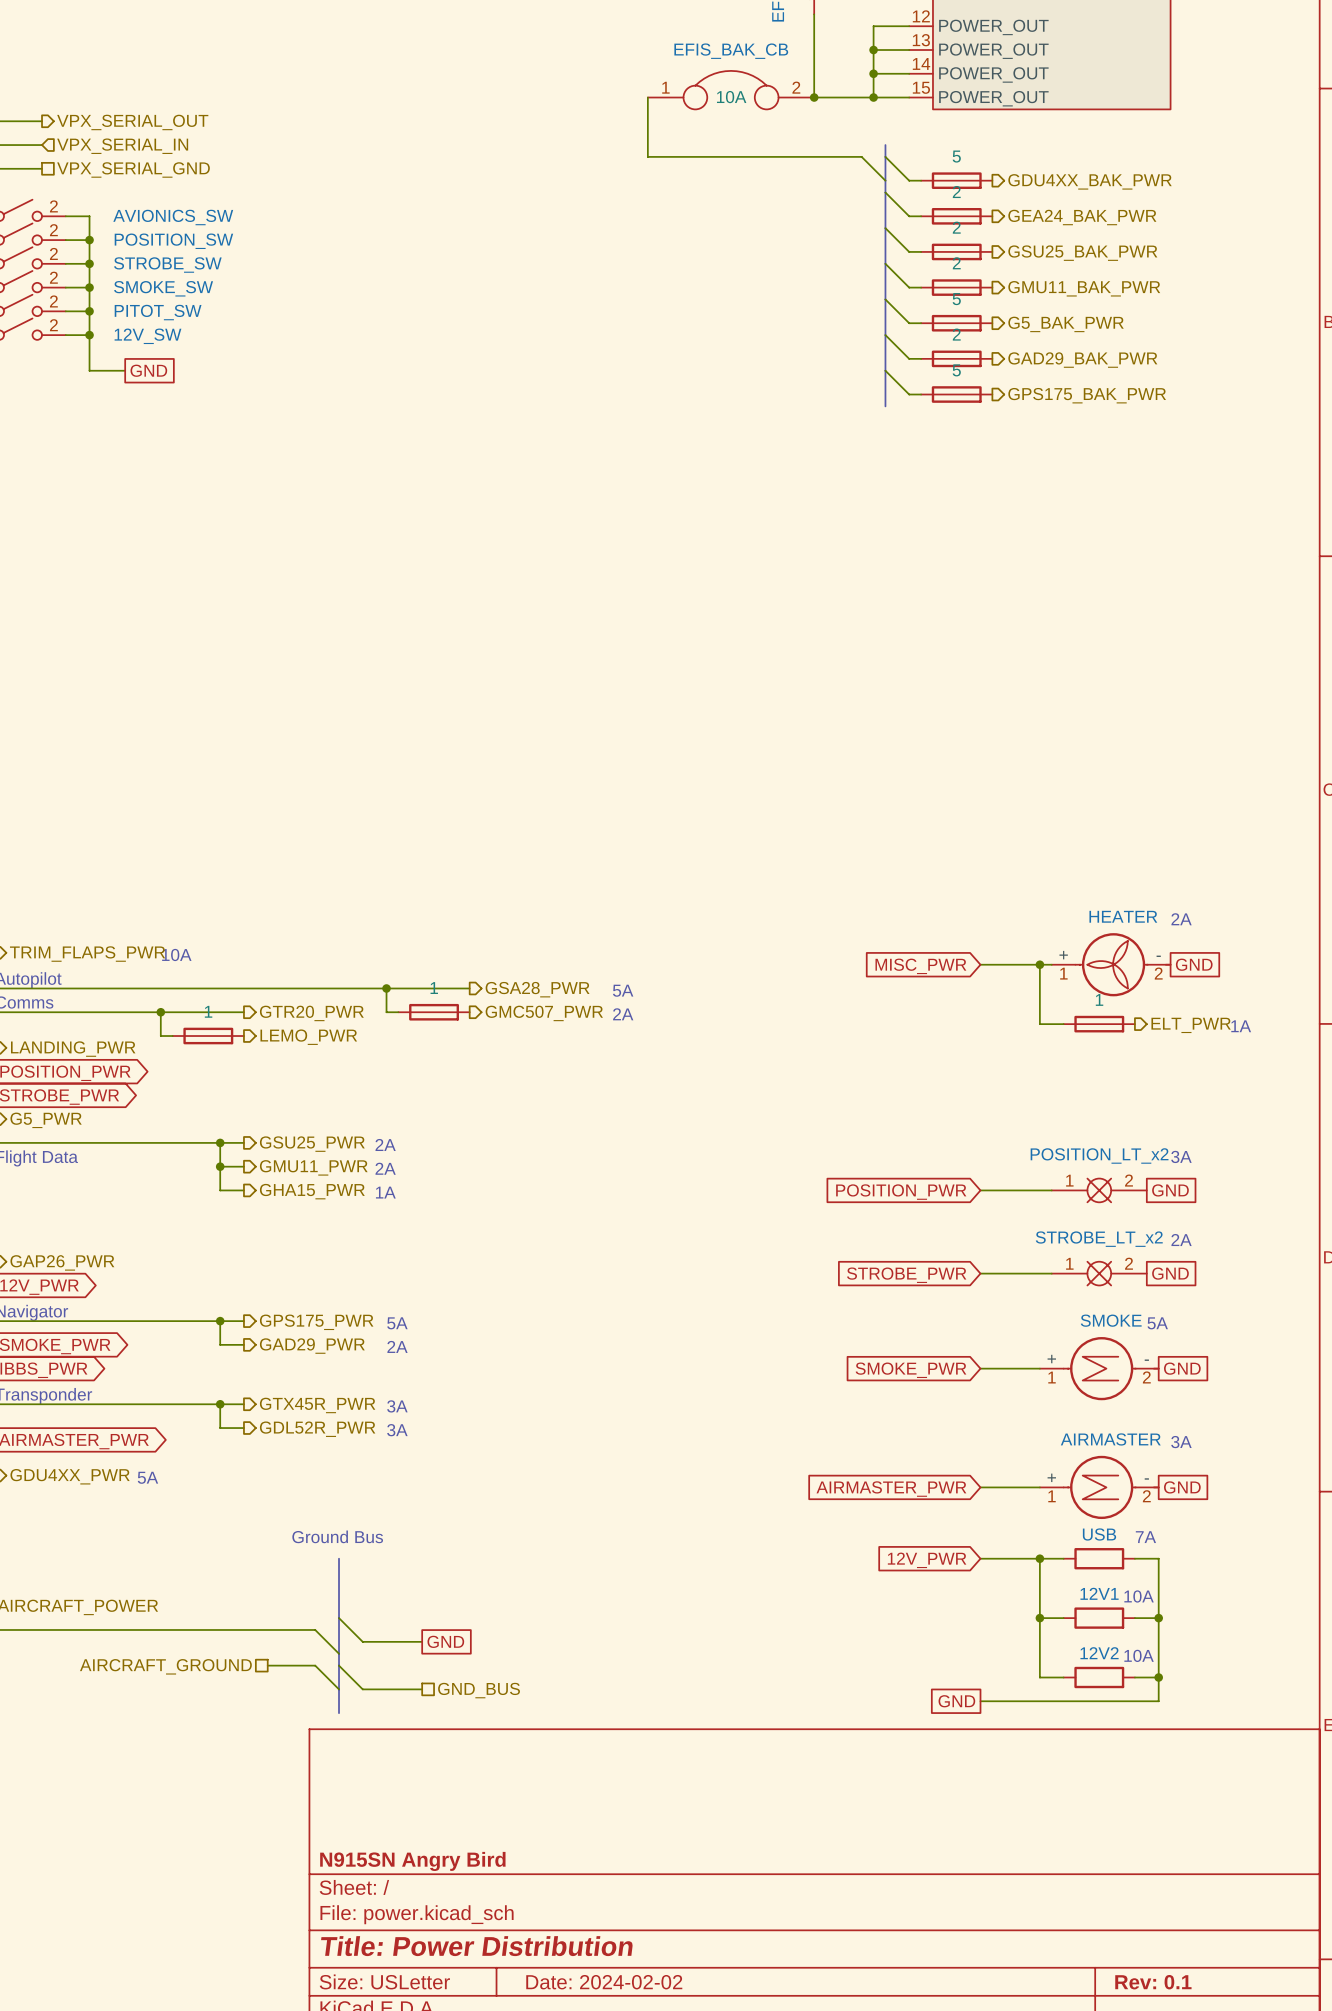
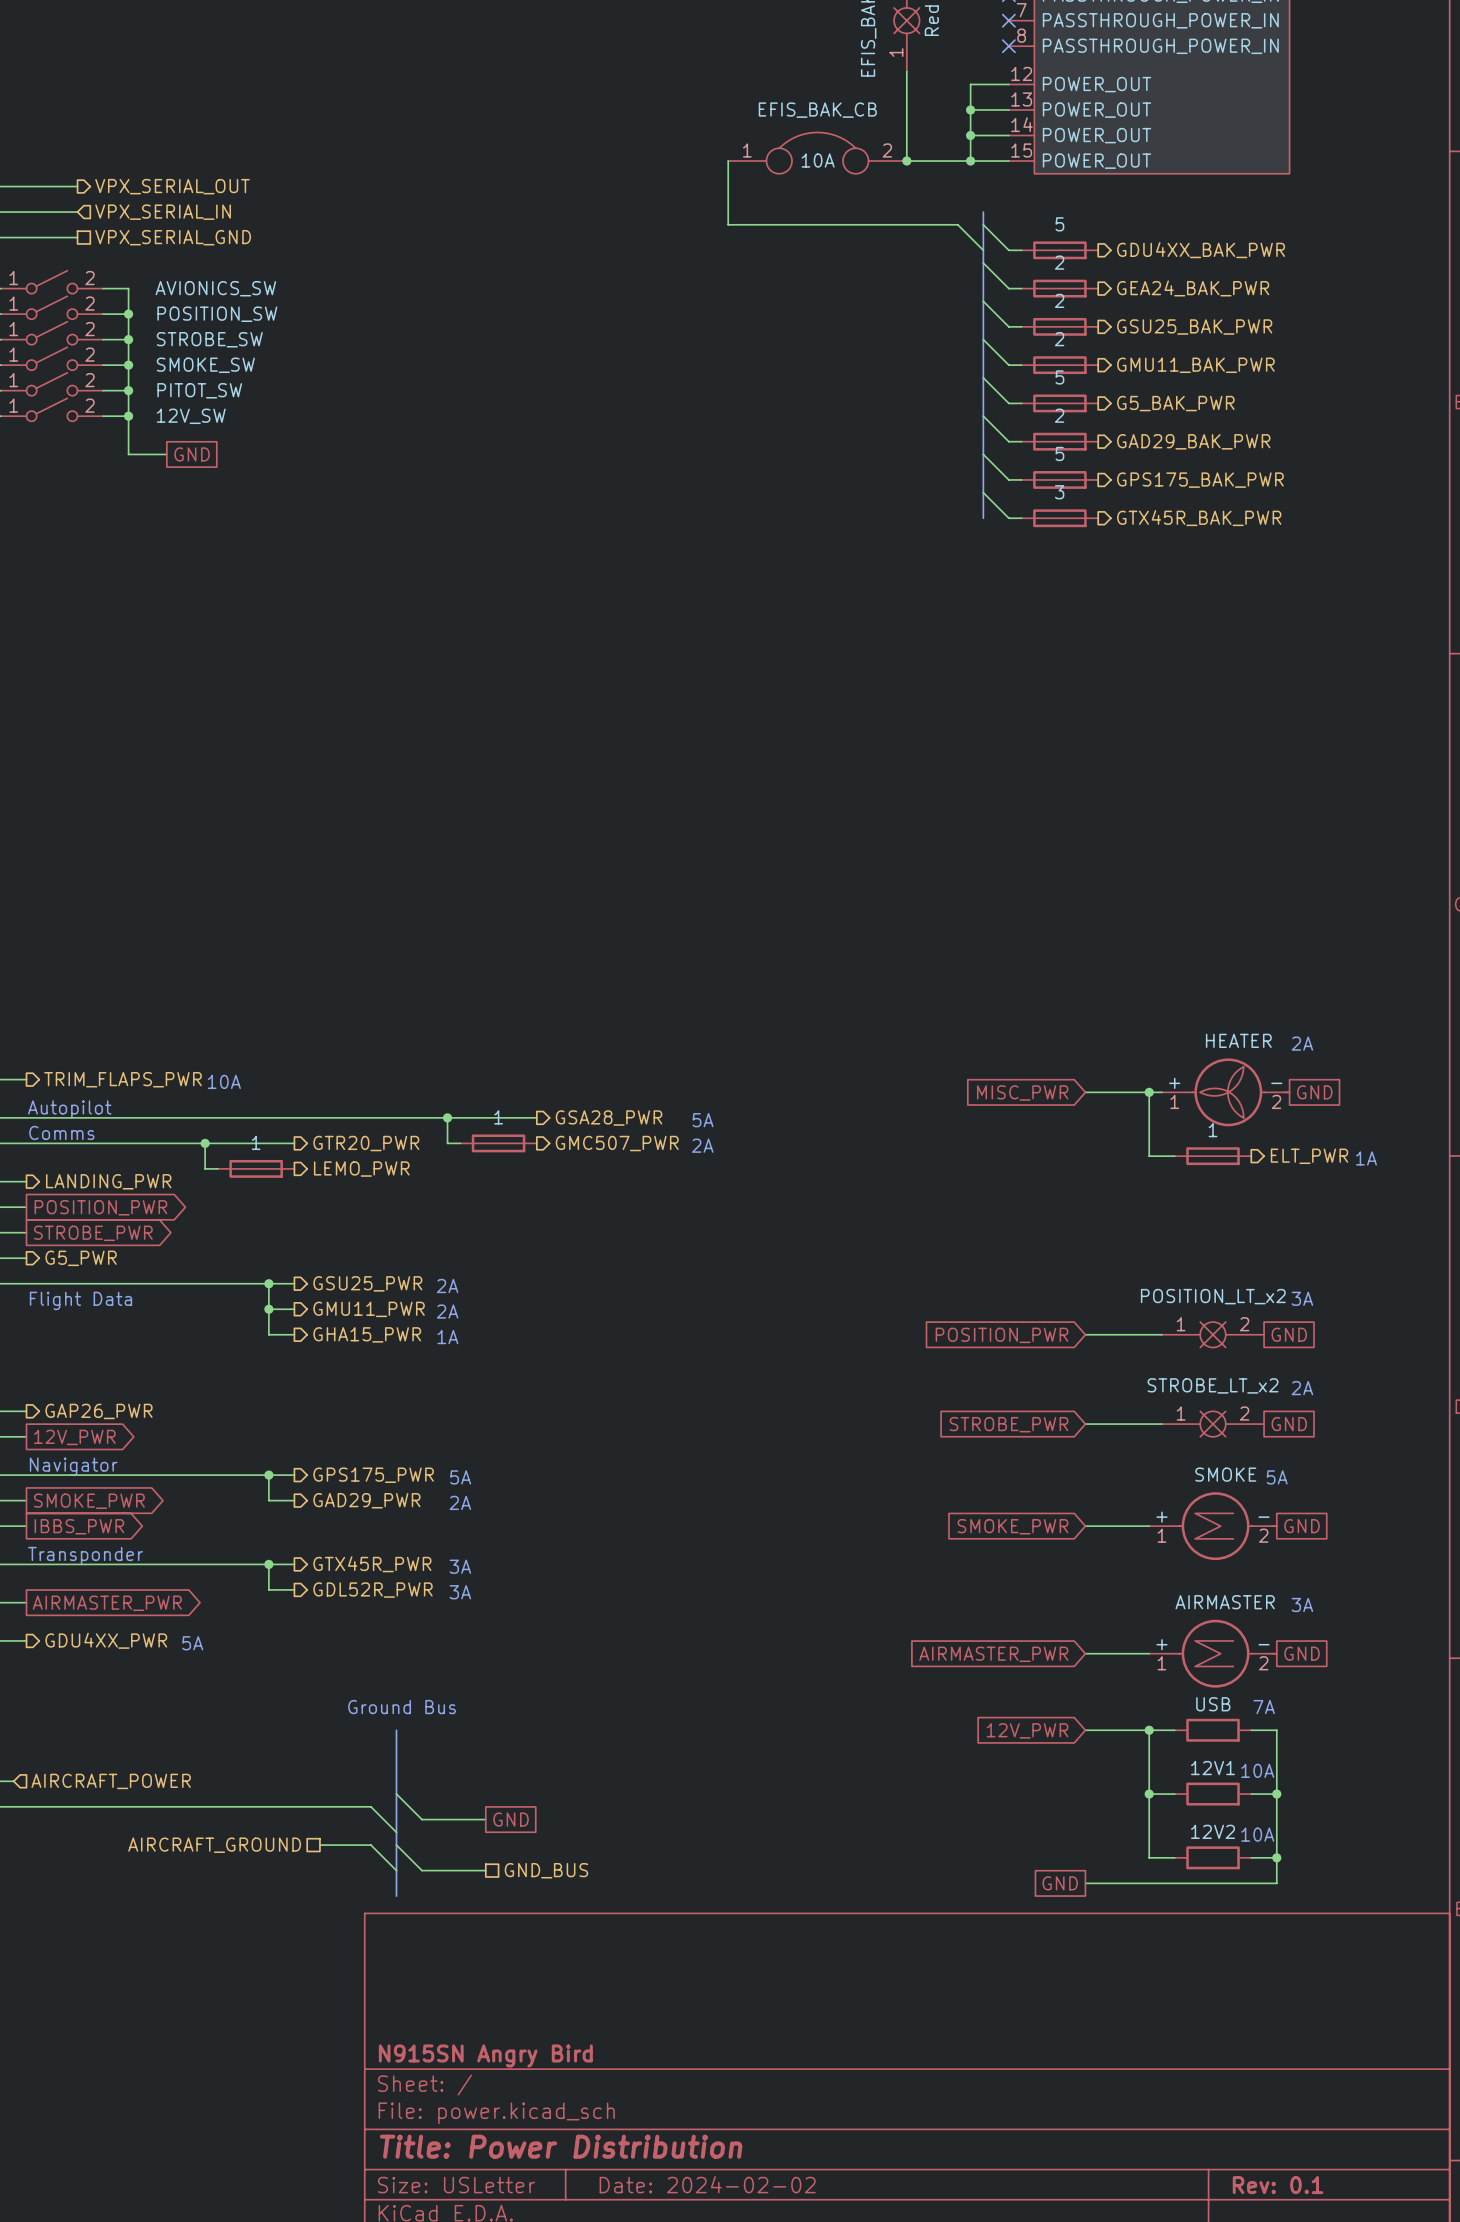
wire: none -> (983, 492) (1008, 518) (1021, 518)
bus: none -> (983, 492) (983, 518)
part: none -> 3 (1059, 518)
hierarchical label: none -> GTX45R_BAK_PWR (1199, 518)

